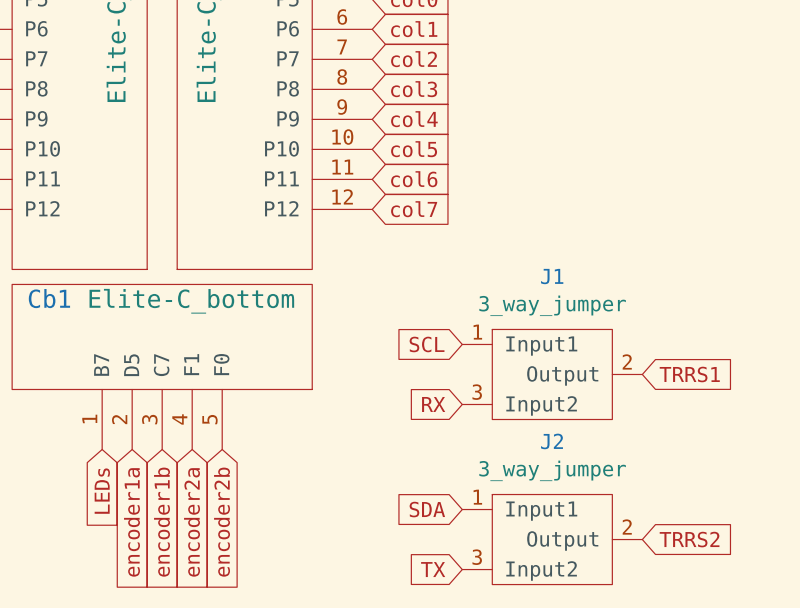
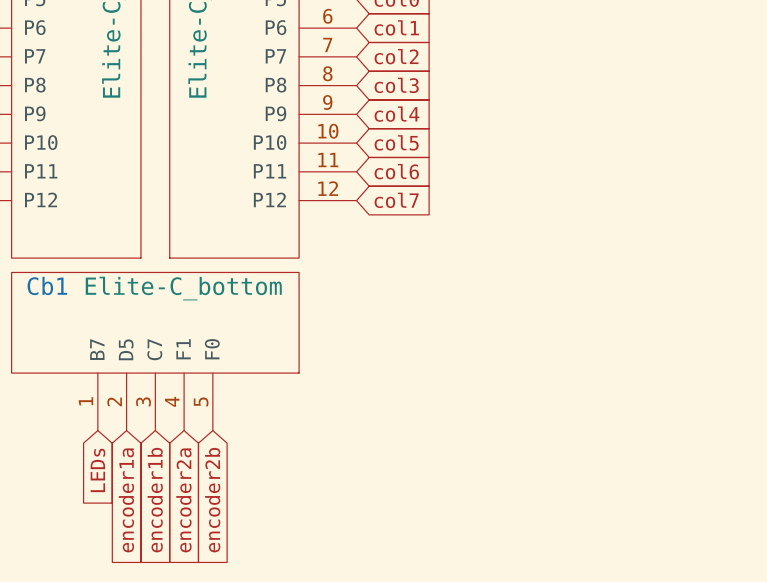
global label: SCL (427, 344) -> none
J1: 3_way_jumper (552, 374) -> none
global label: TRRS1 (689, 374) -> none
global label: RX (433, 404) -> none
global label: SDA (427, 509) -> none
J2: 3_way_jumper (552, 539) -> none
global label: TRRS2 (689, 539) -> none
global label: TX (433, 569) -> none

